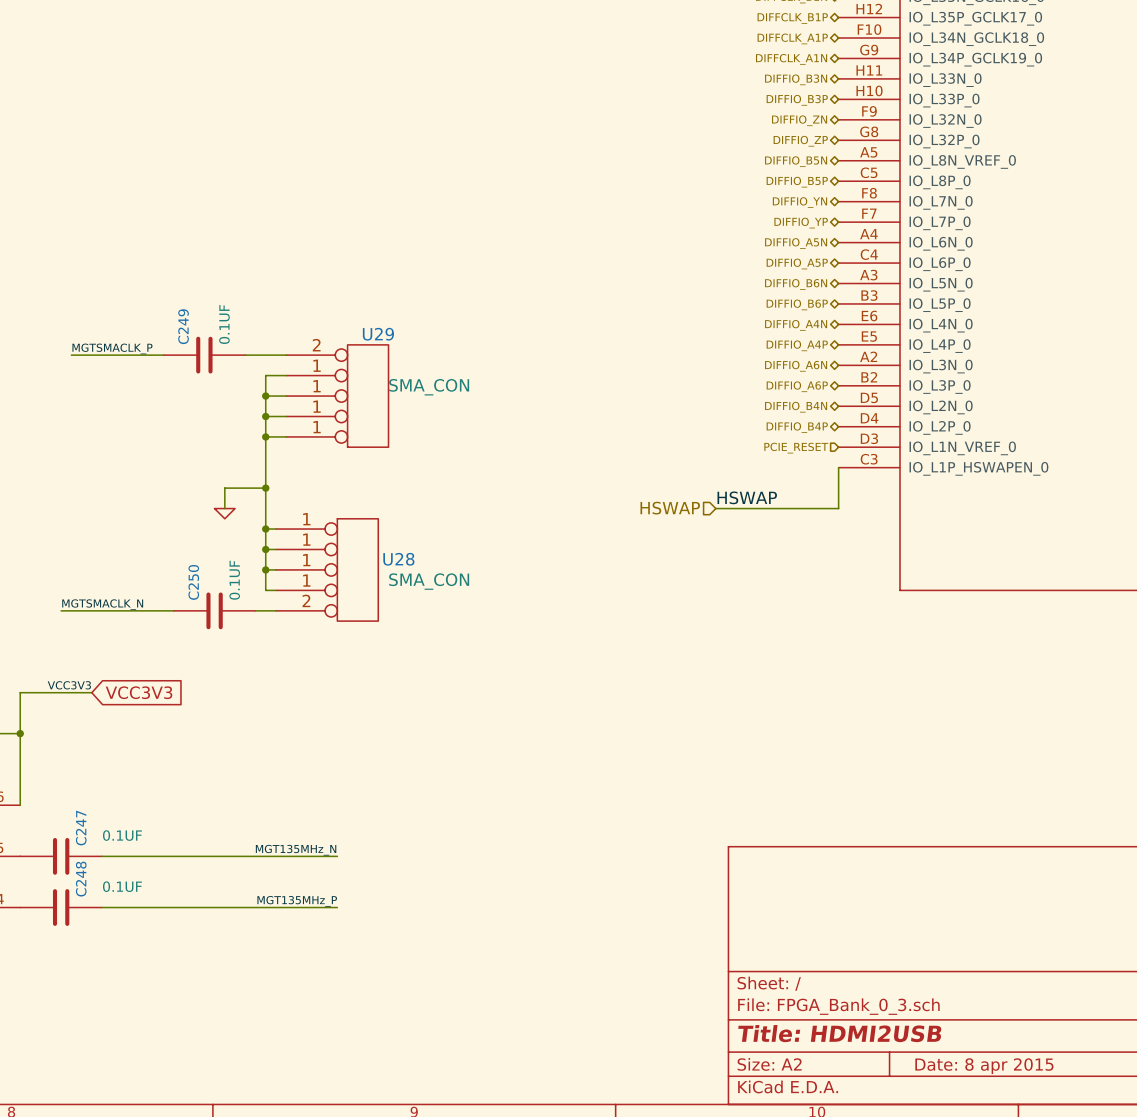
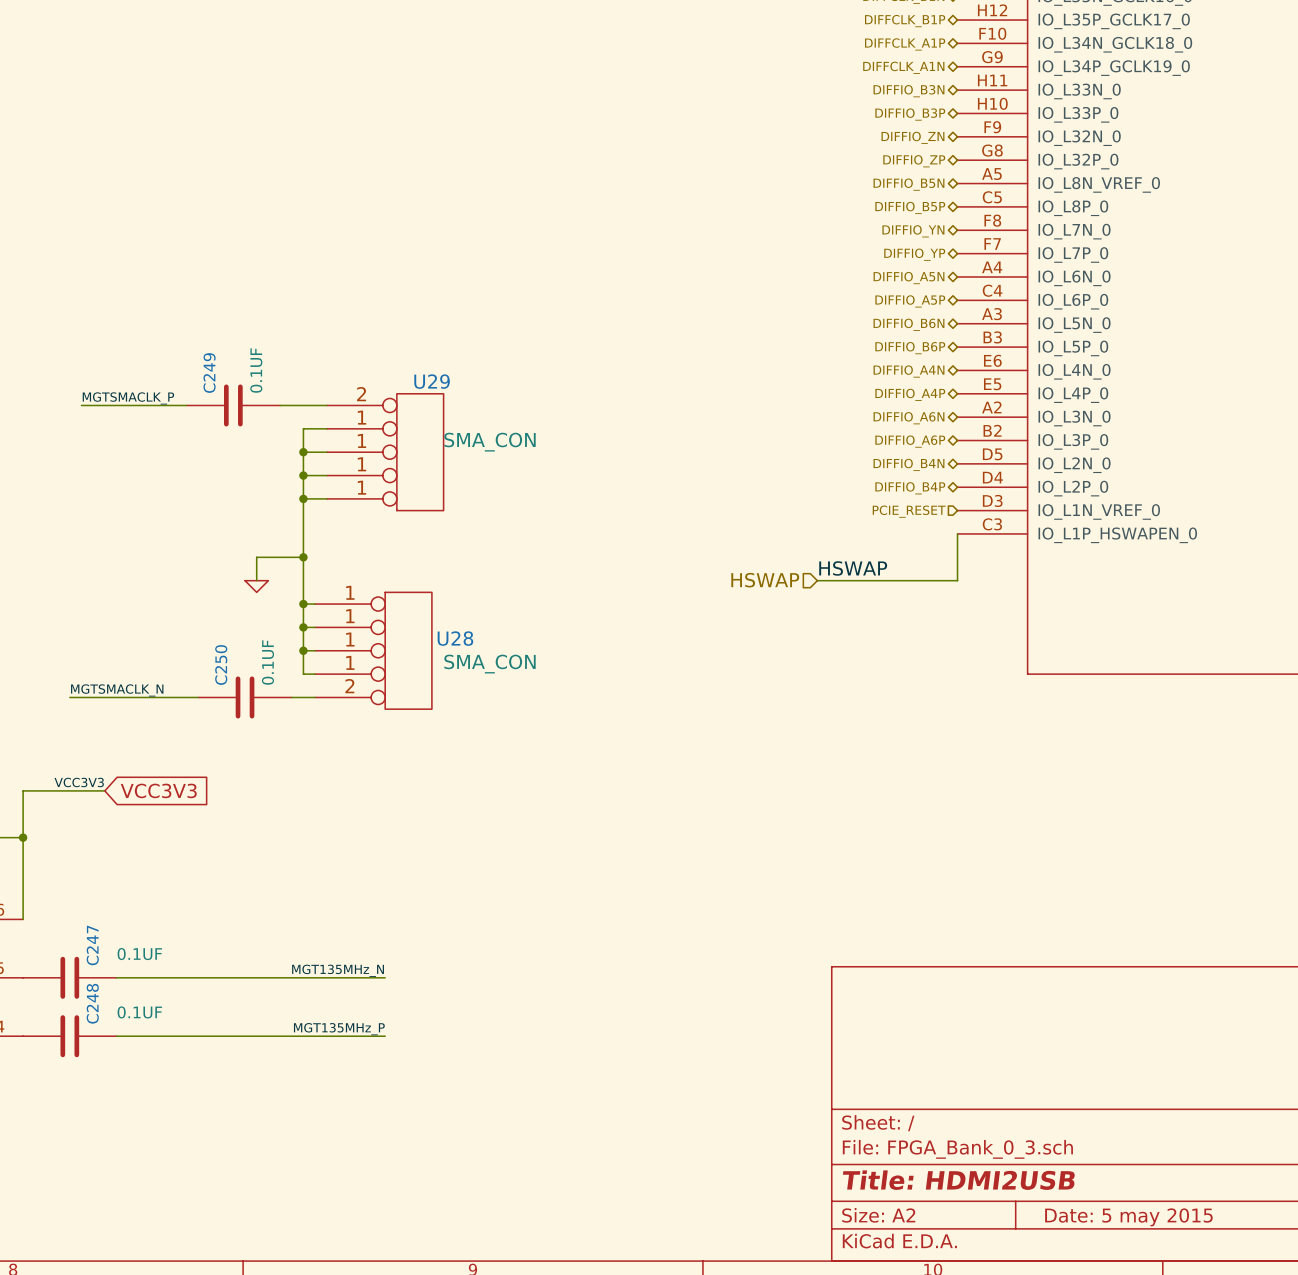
title block: Date: 8 apr 2015 (984, 1066) -> Date: 5 may 2015 (1128, 1217)

